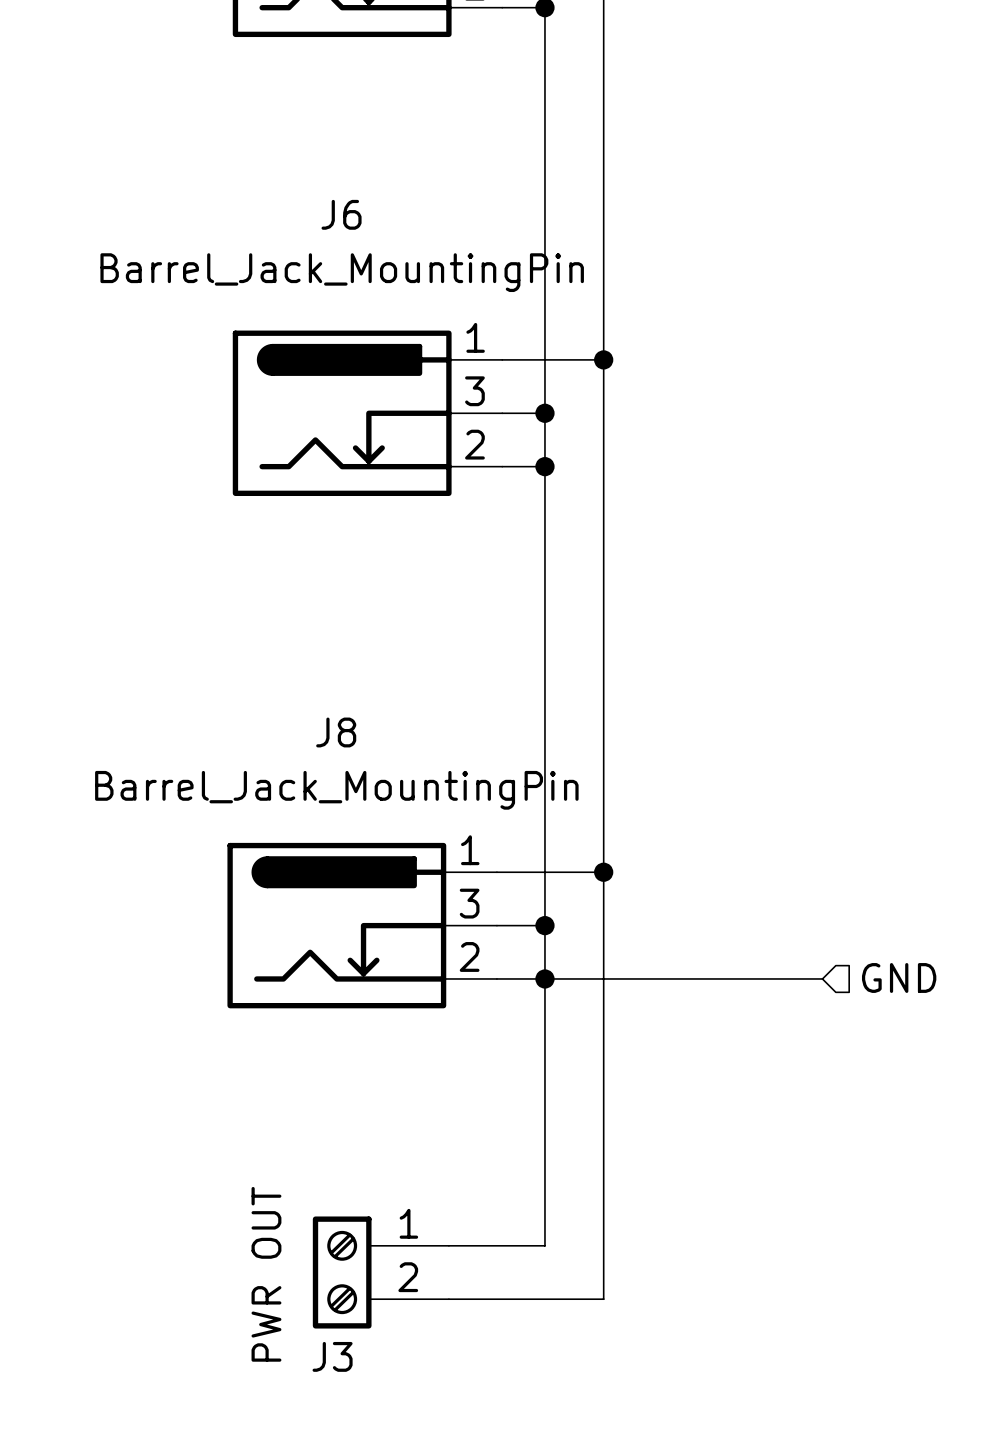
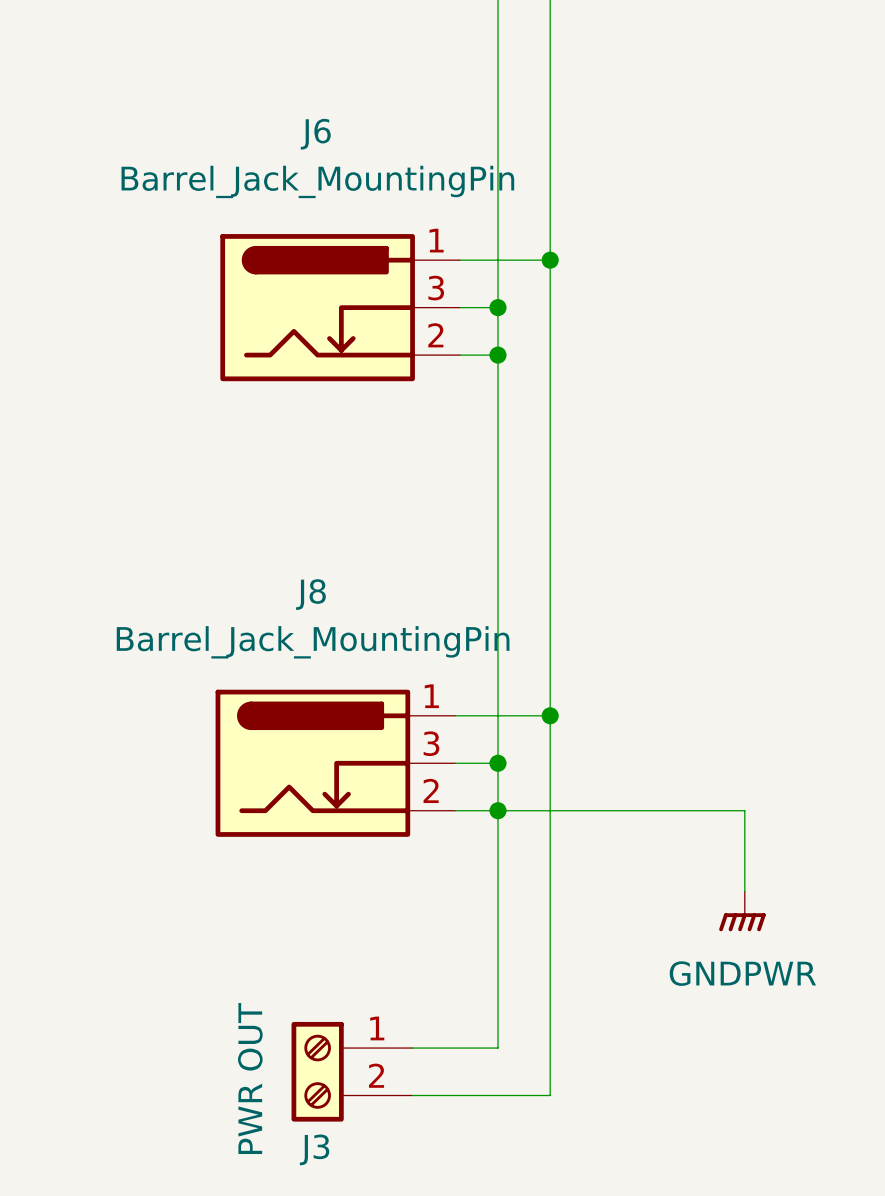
hierarchical label: GND (899, 977) -> none
wire: none -> (744, 810) (744, 891)
power symbol: none -> GNDPWR (742, 911)

